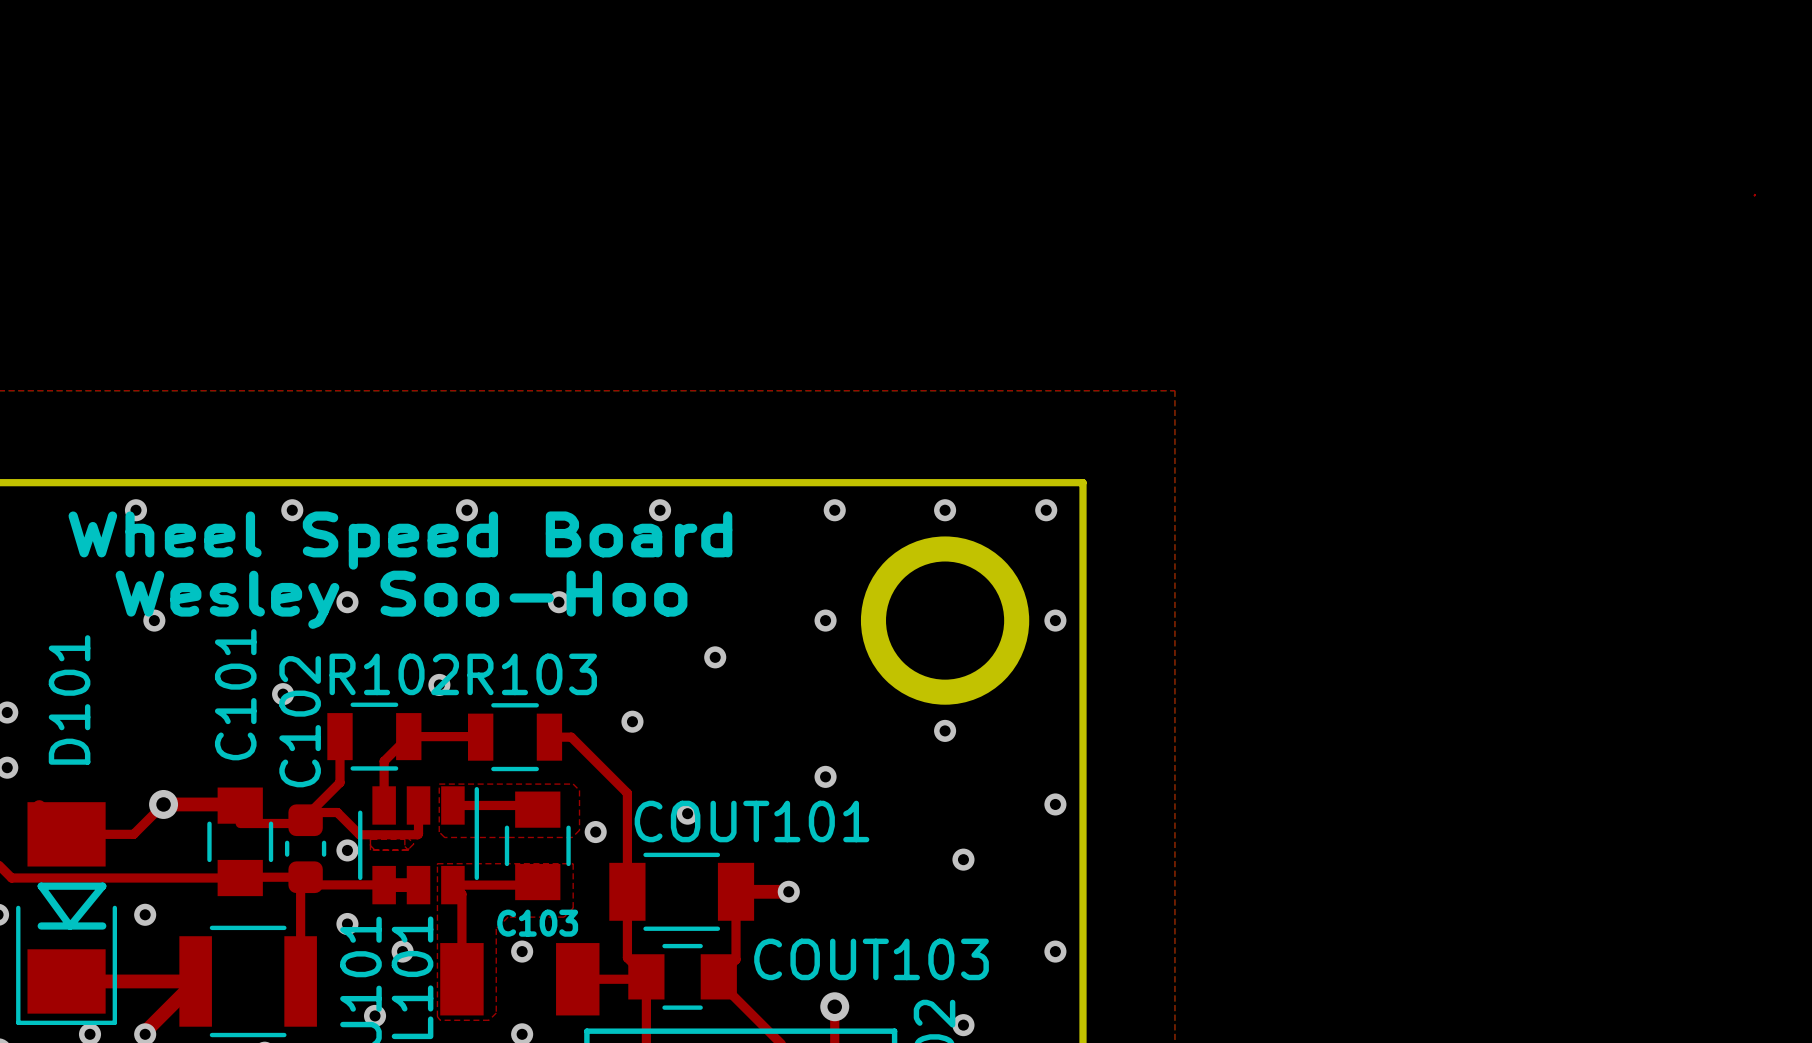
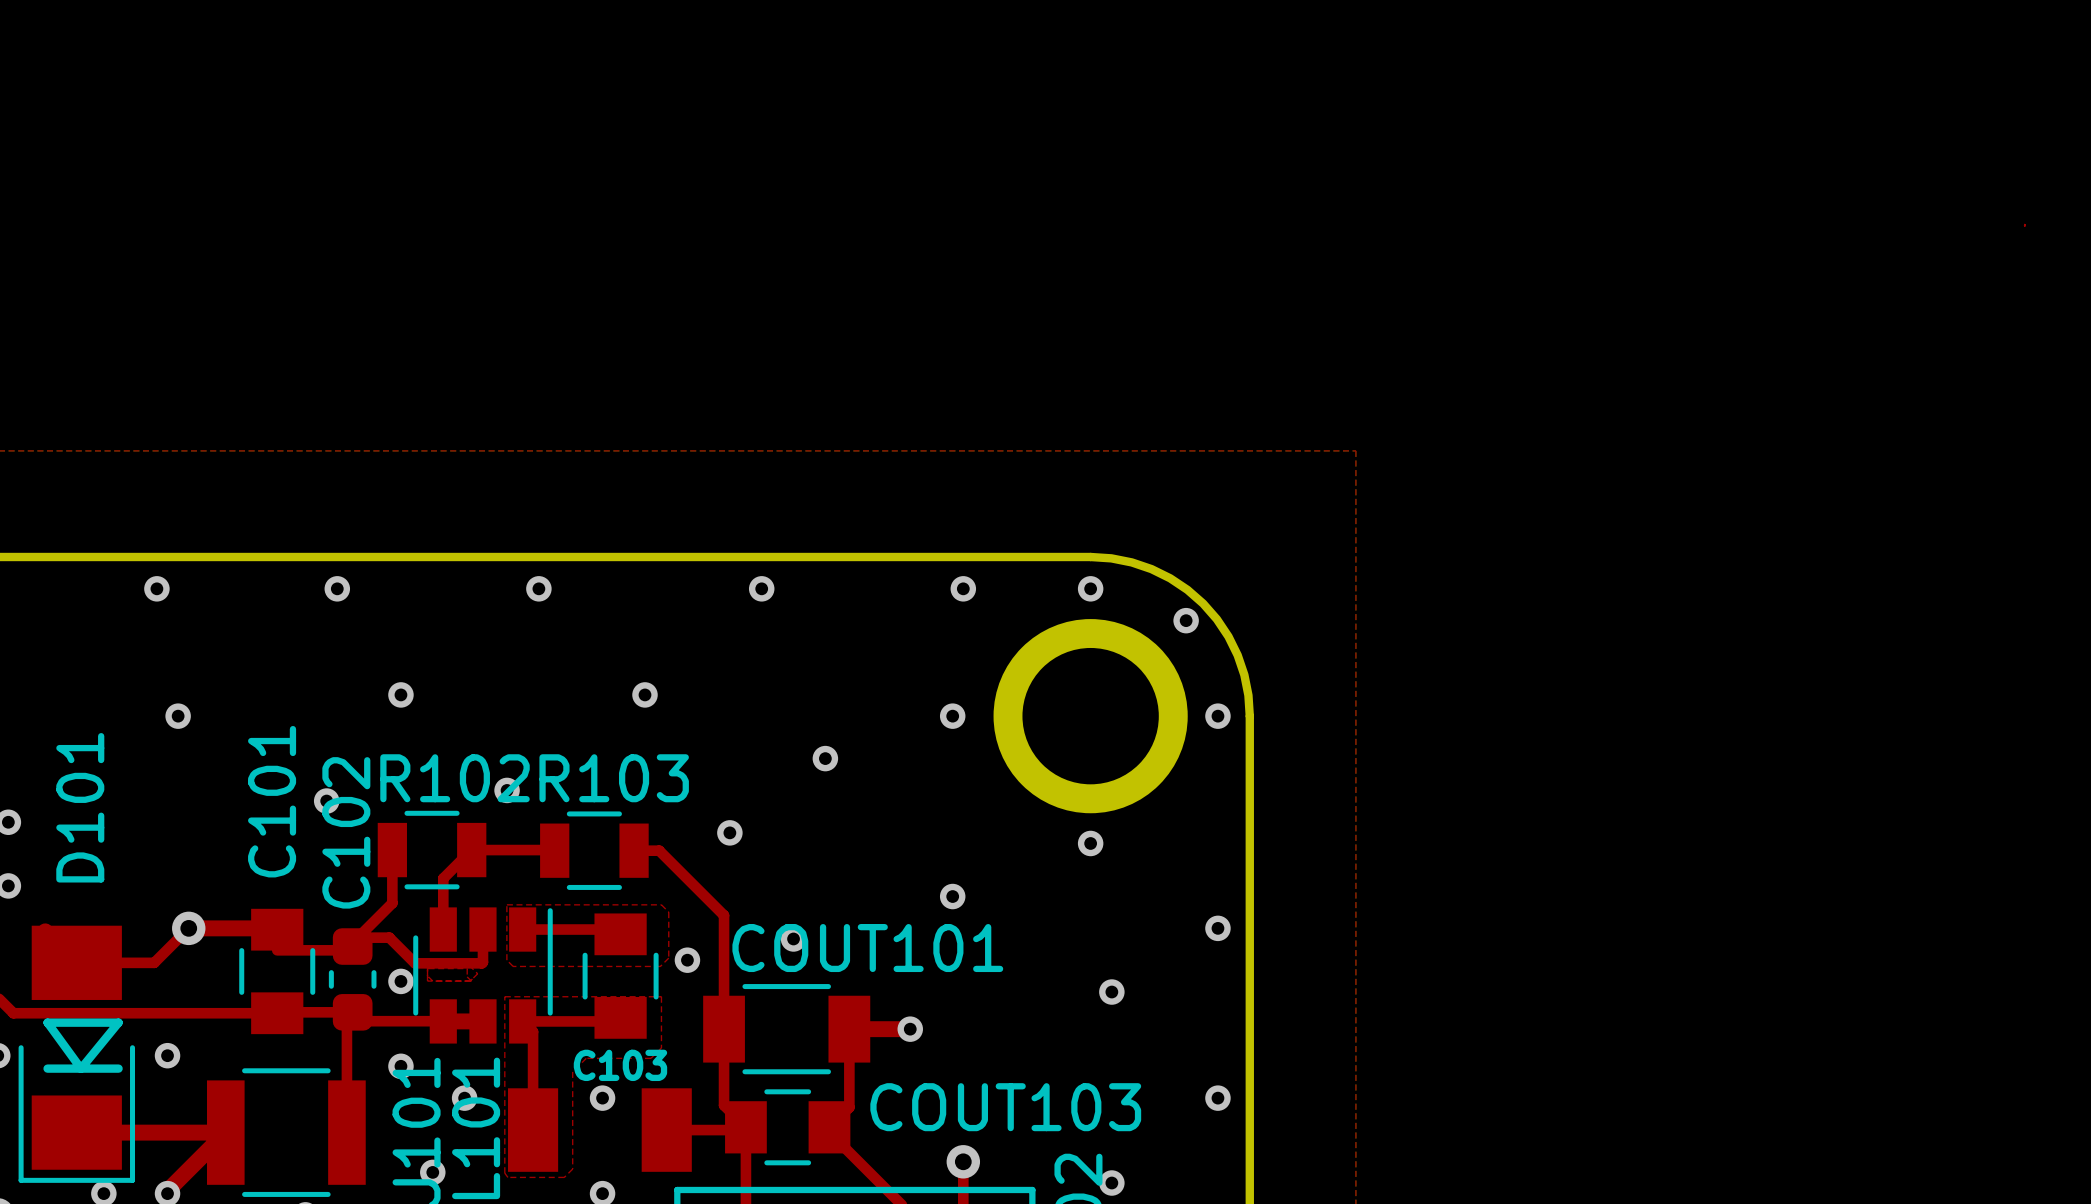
board edge: (945, 482) (1082, 482) (1082, 620) -> (1090, 556) (1111, 558) (1151, 569) (1170, 578) (1203, 603) (1228, 636) (1237, 655) (1248, 695) (1249, 716)
via position: (1046, 510) -> (1186, 620)
text: Wheel Speed Board (400, 540) -> none
text: Wesley Soo-Hoo (401, 599) -> none

